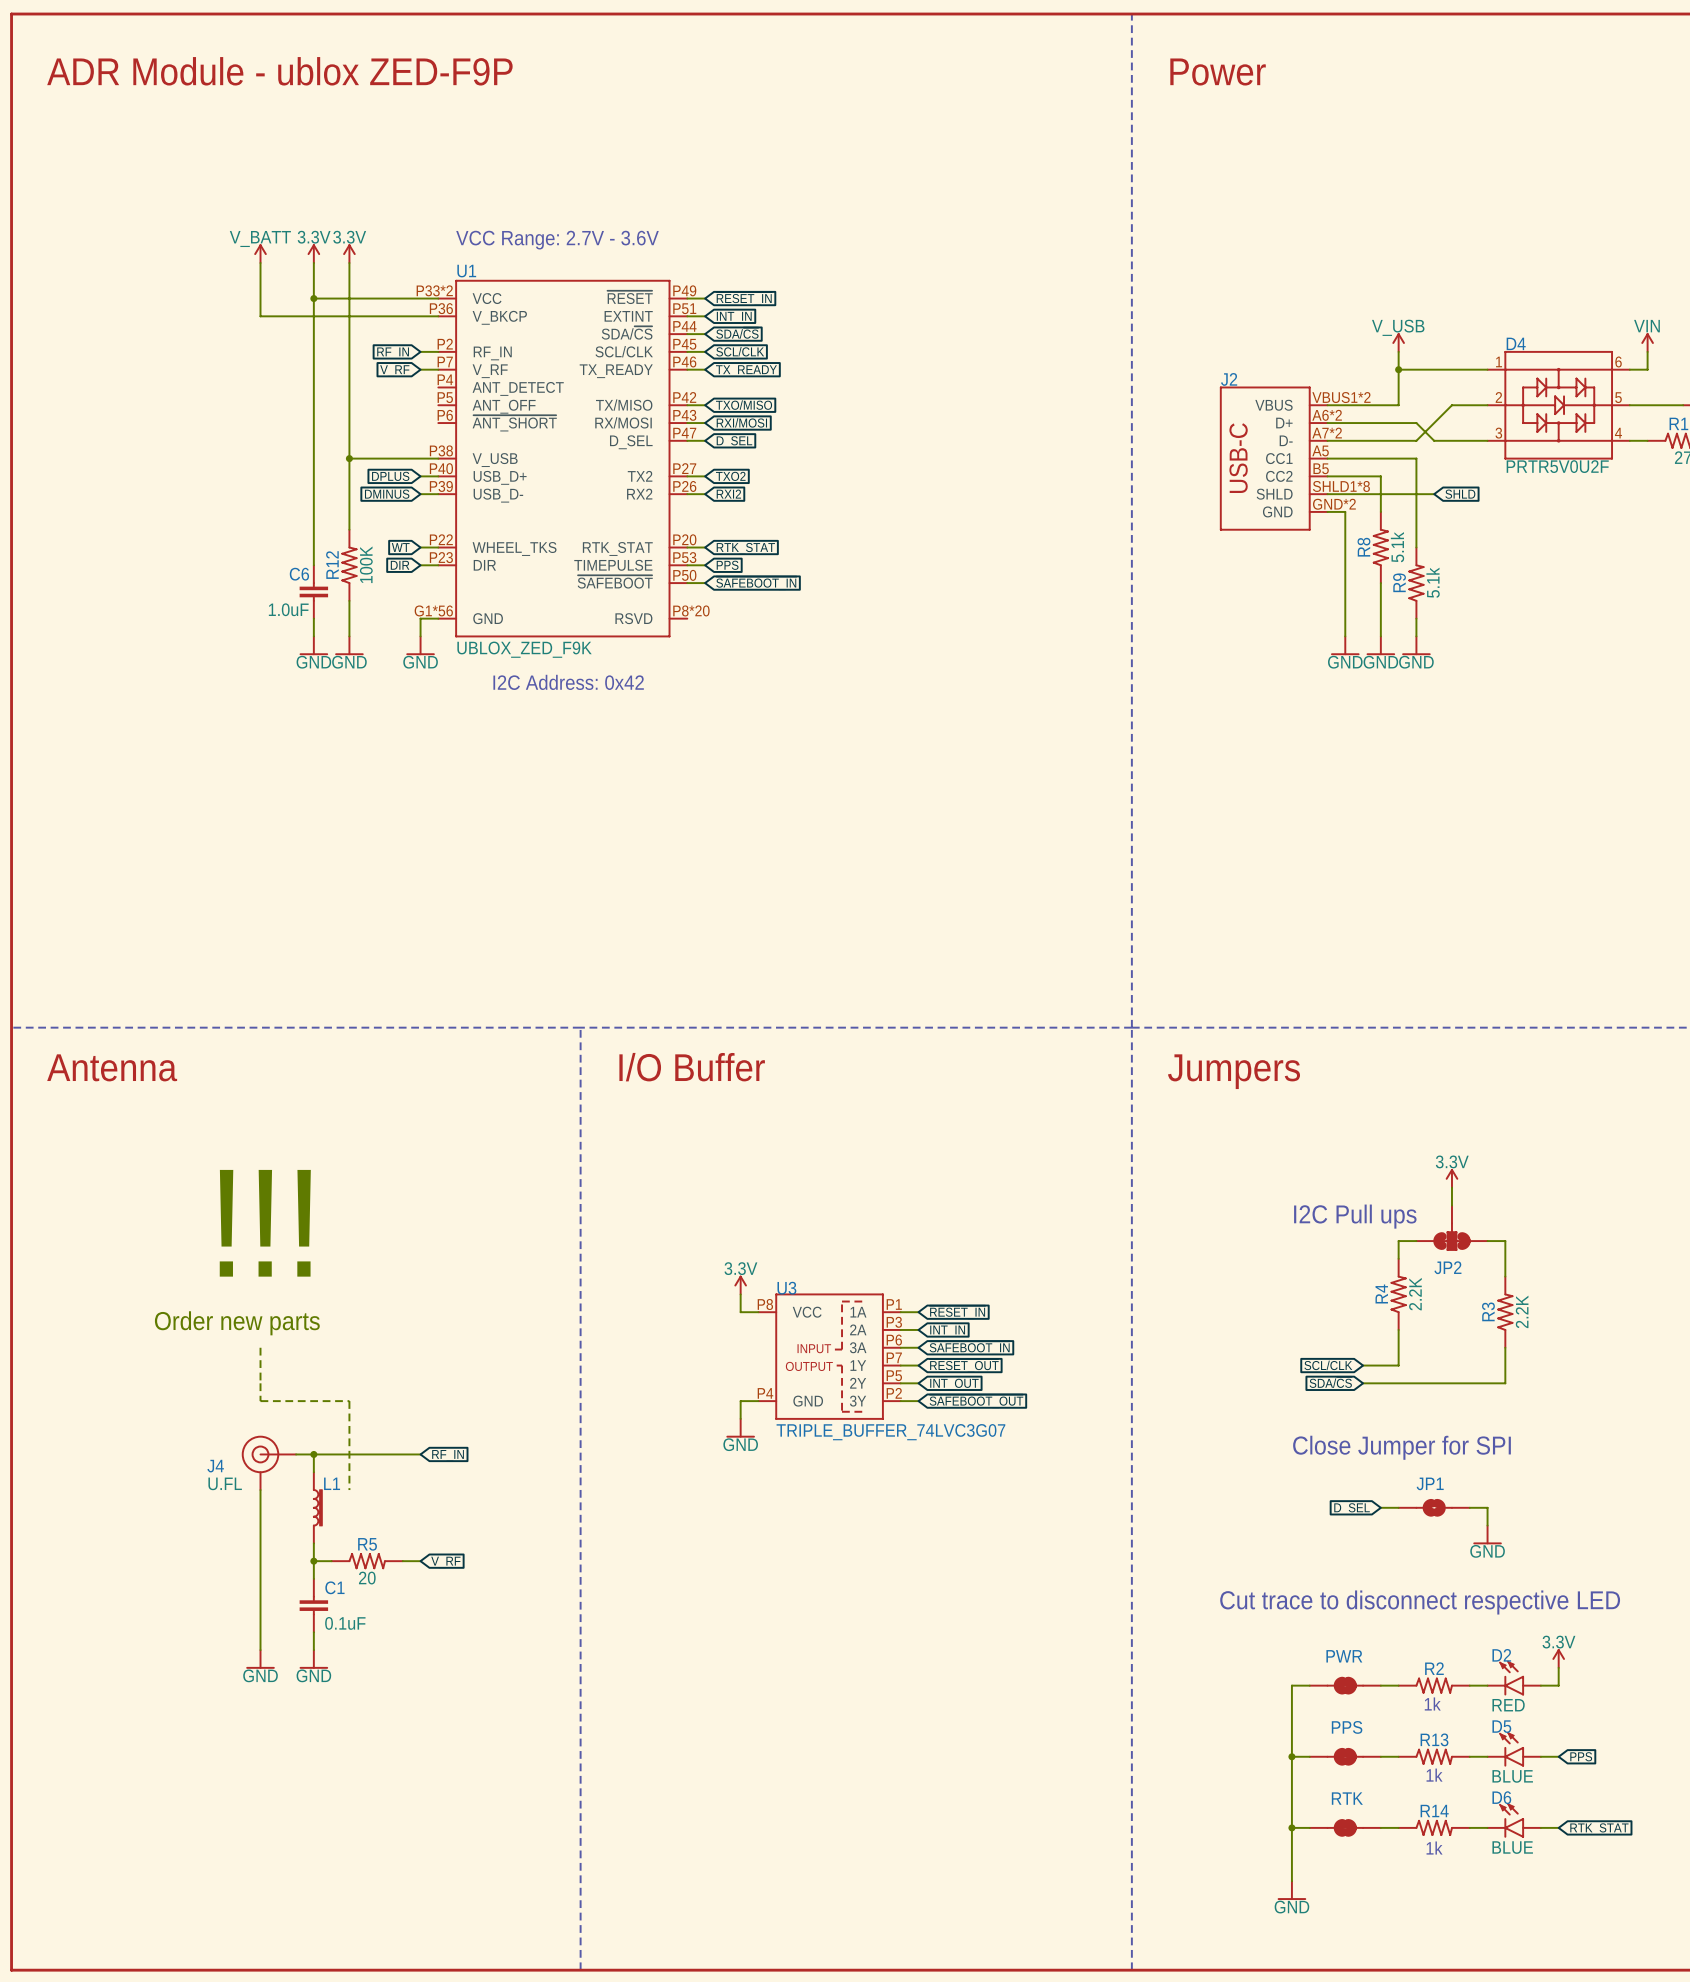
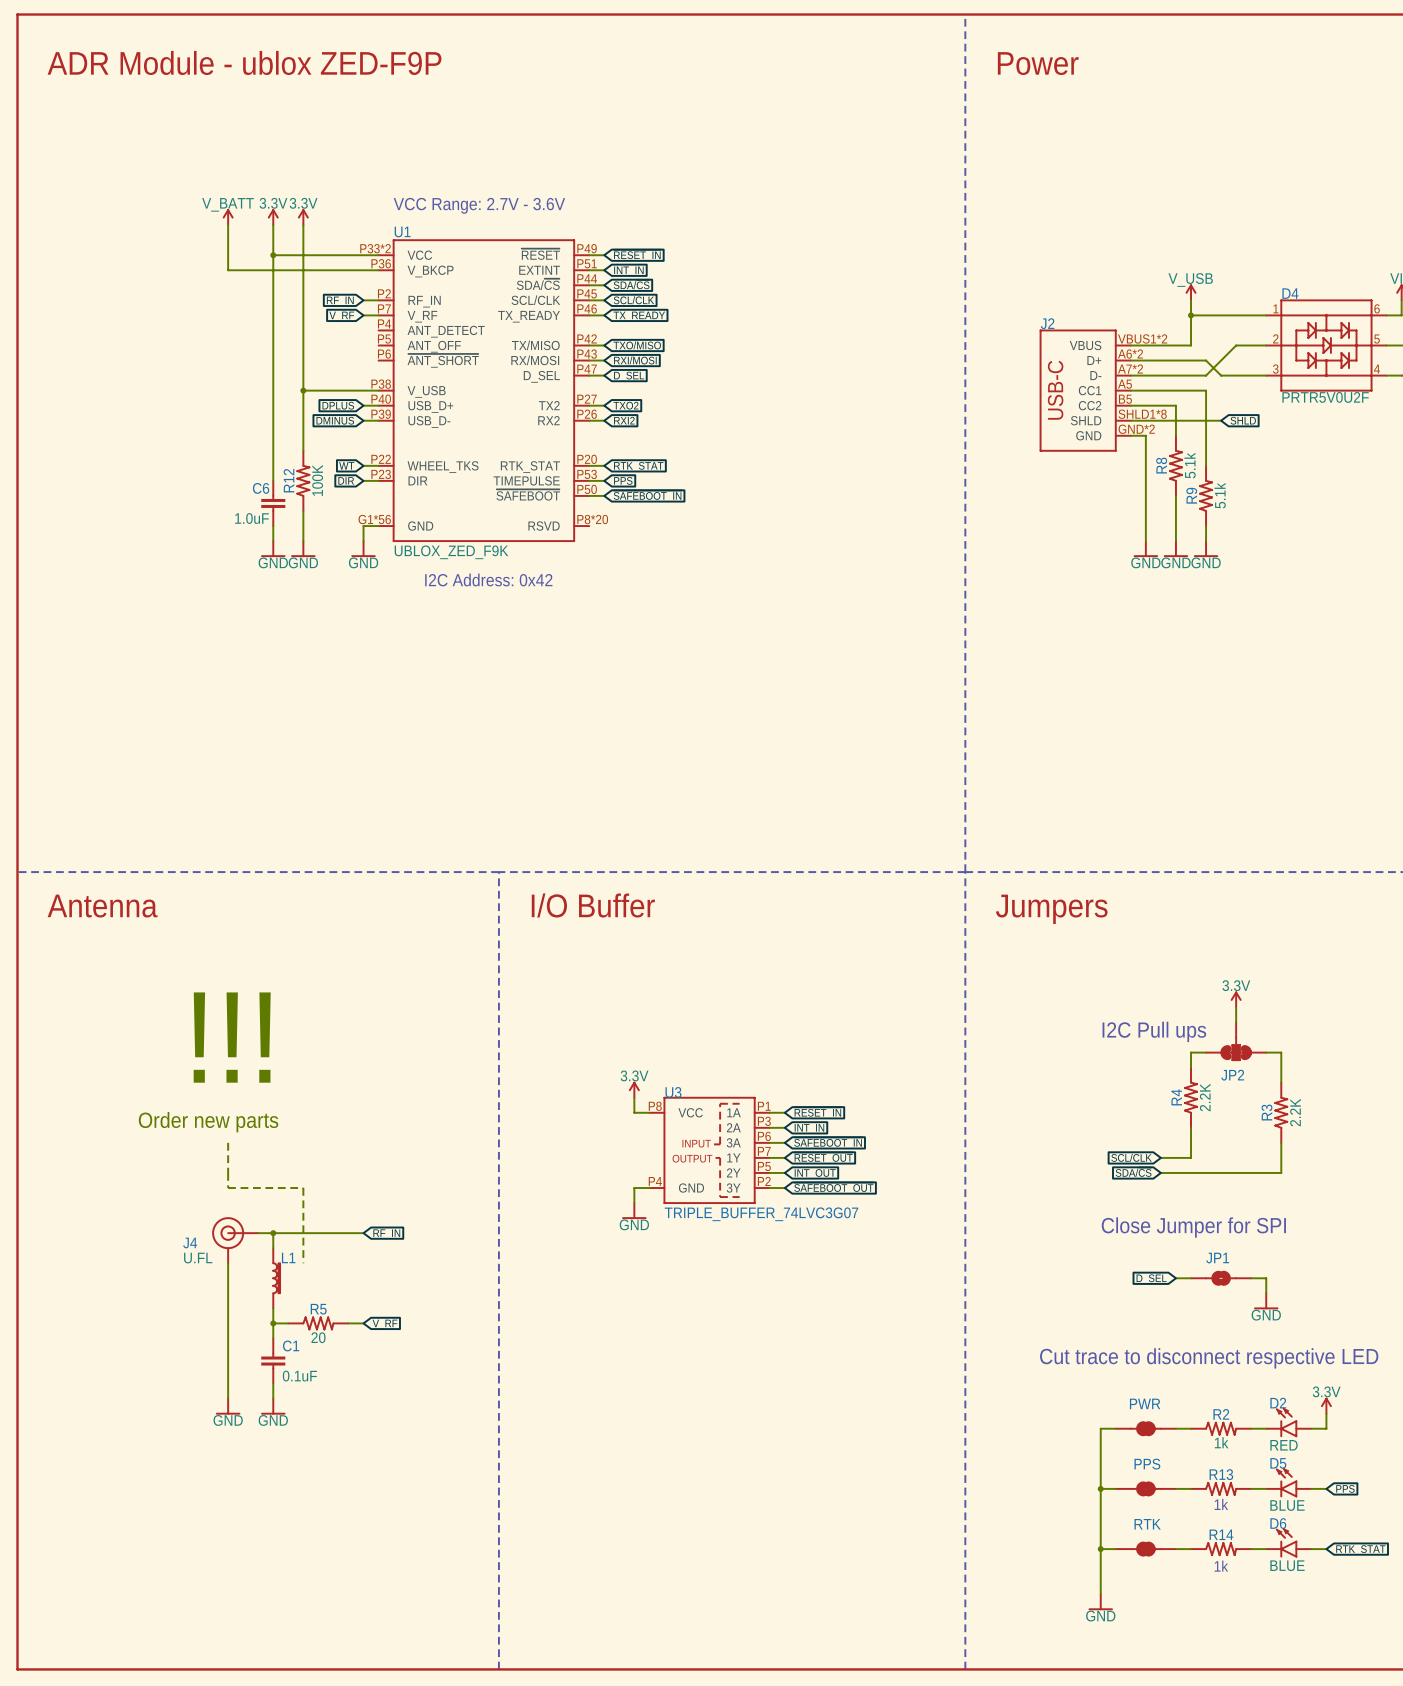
R2 value: none -> 1k (1221, 1442)
text: 1k (1432, 1703) -> none

